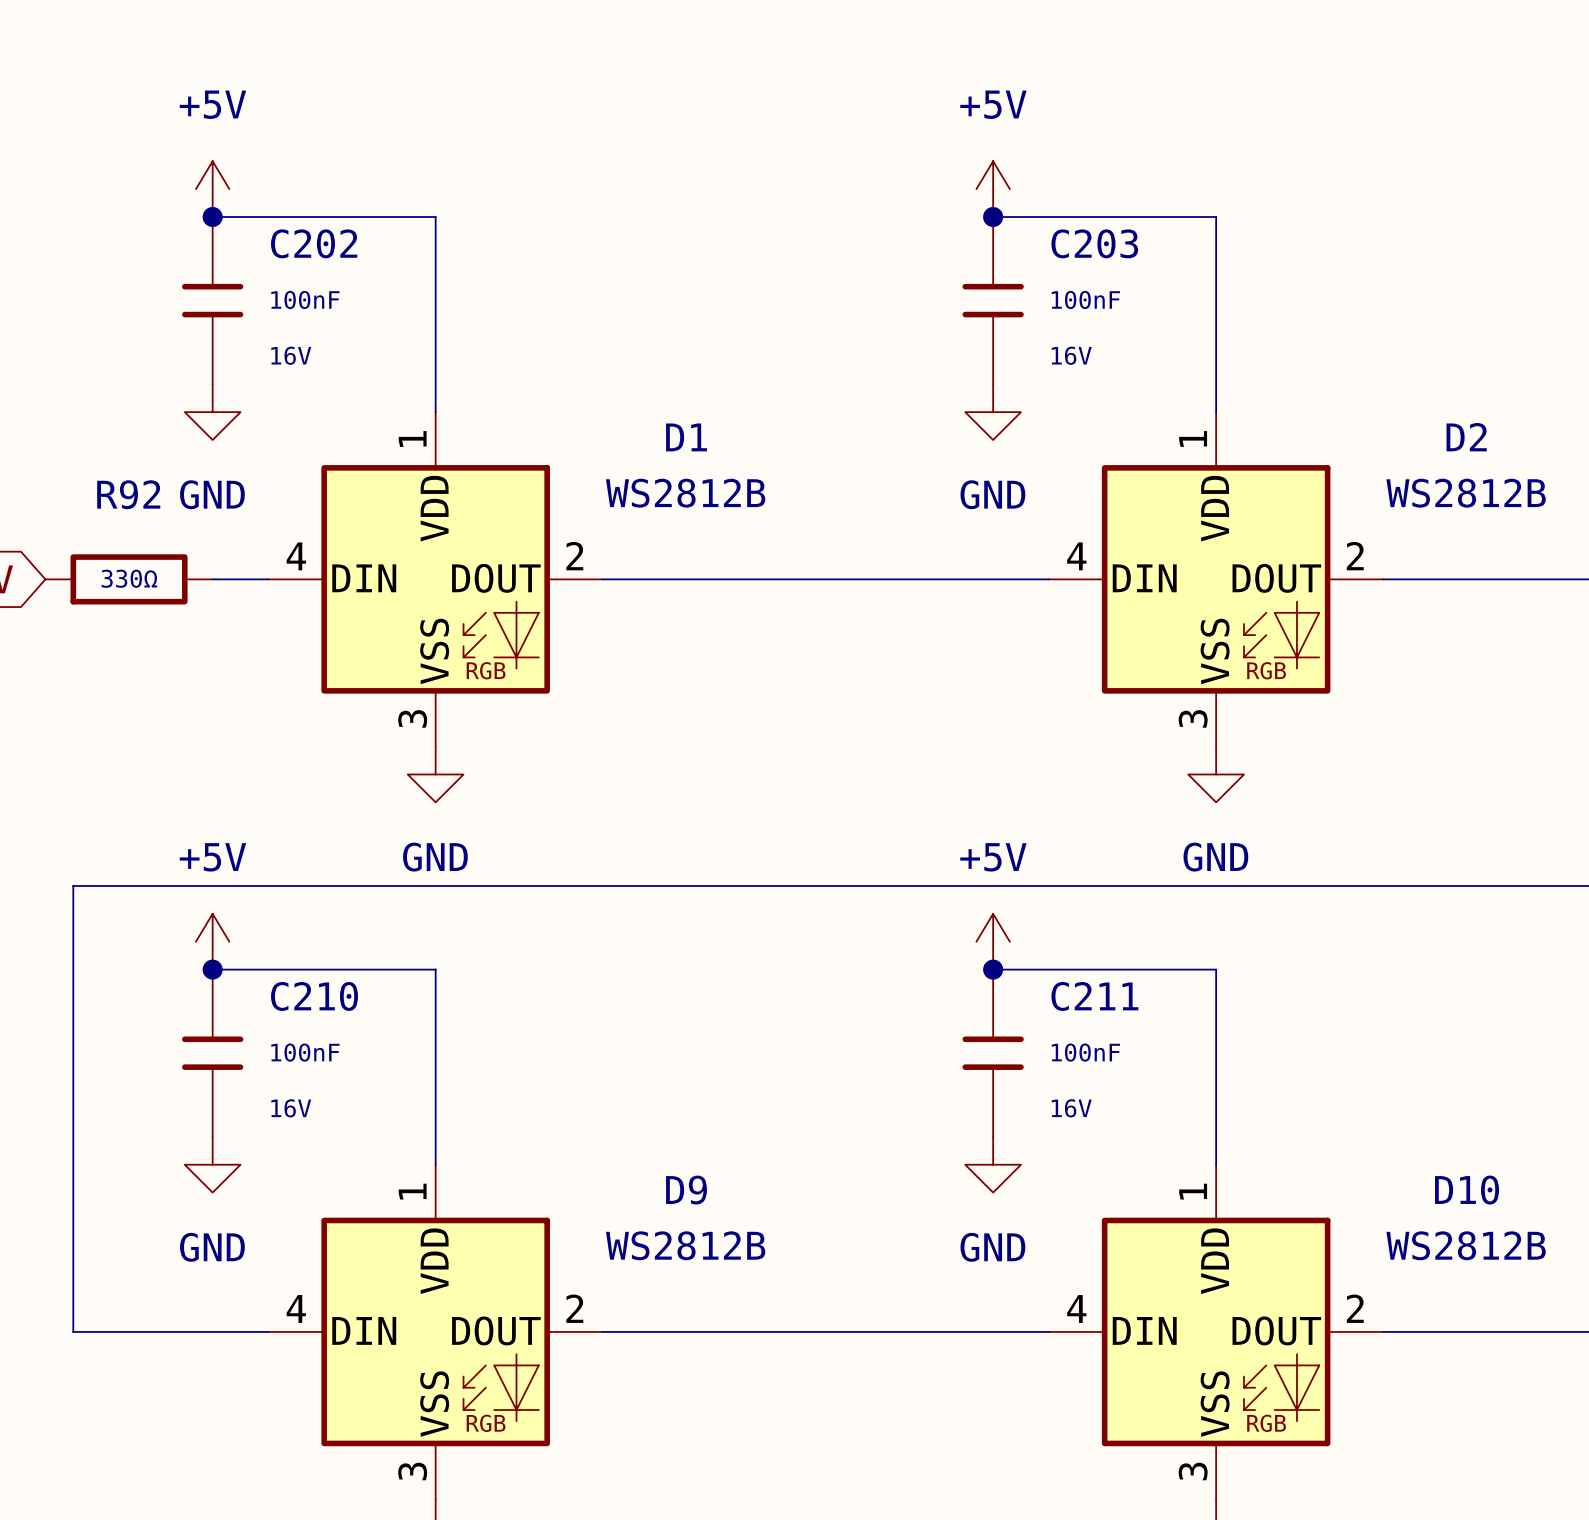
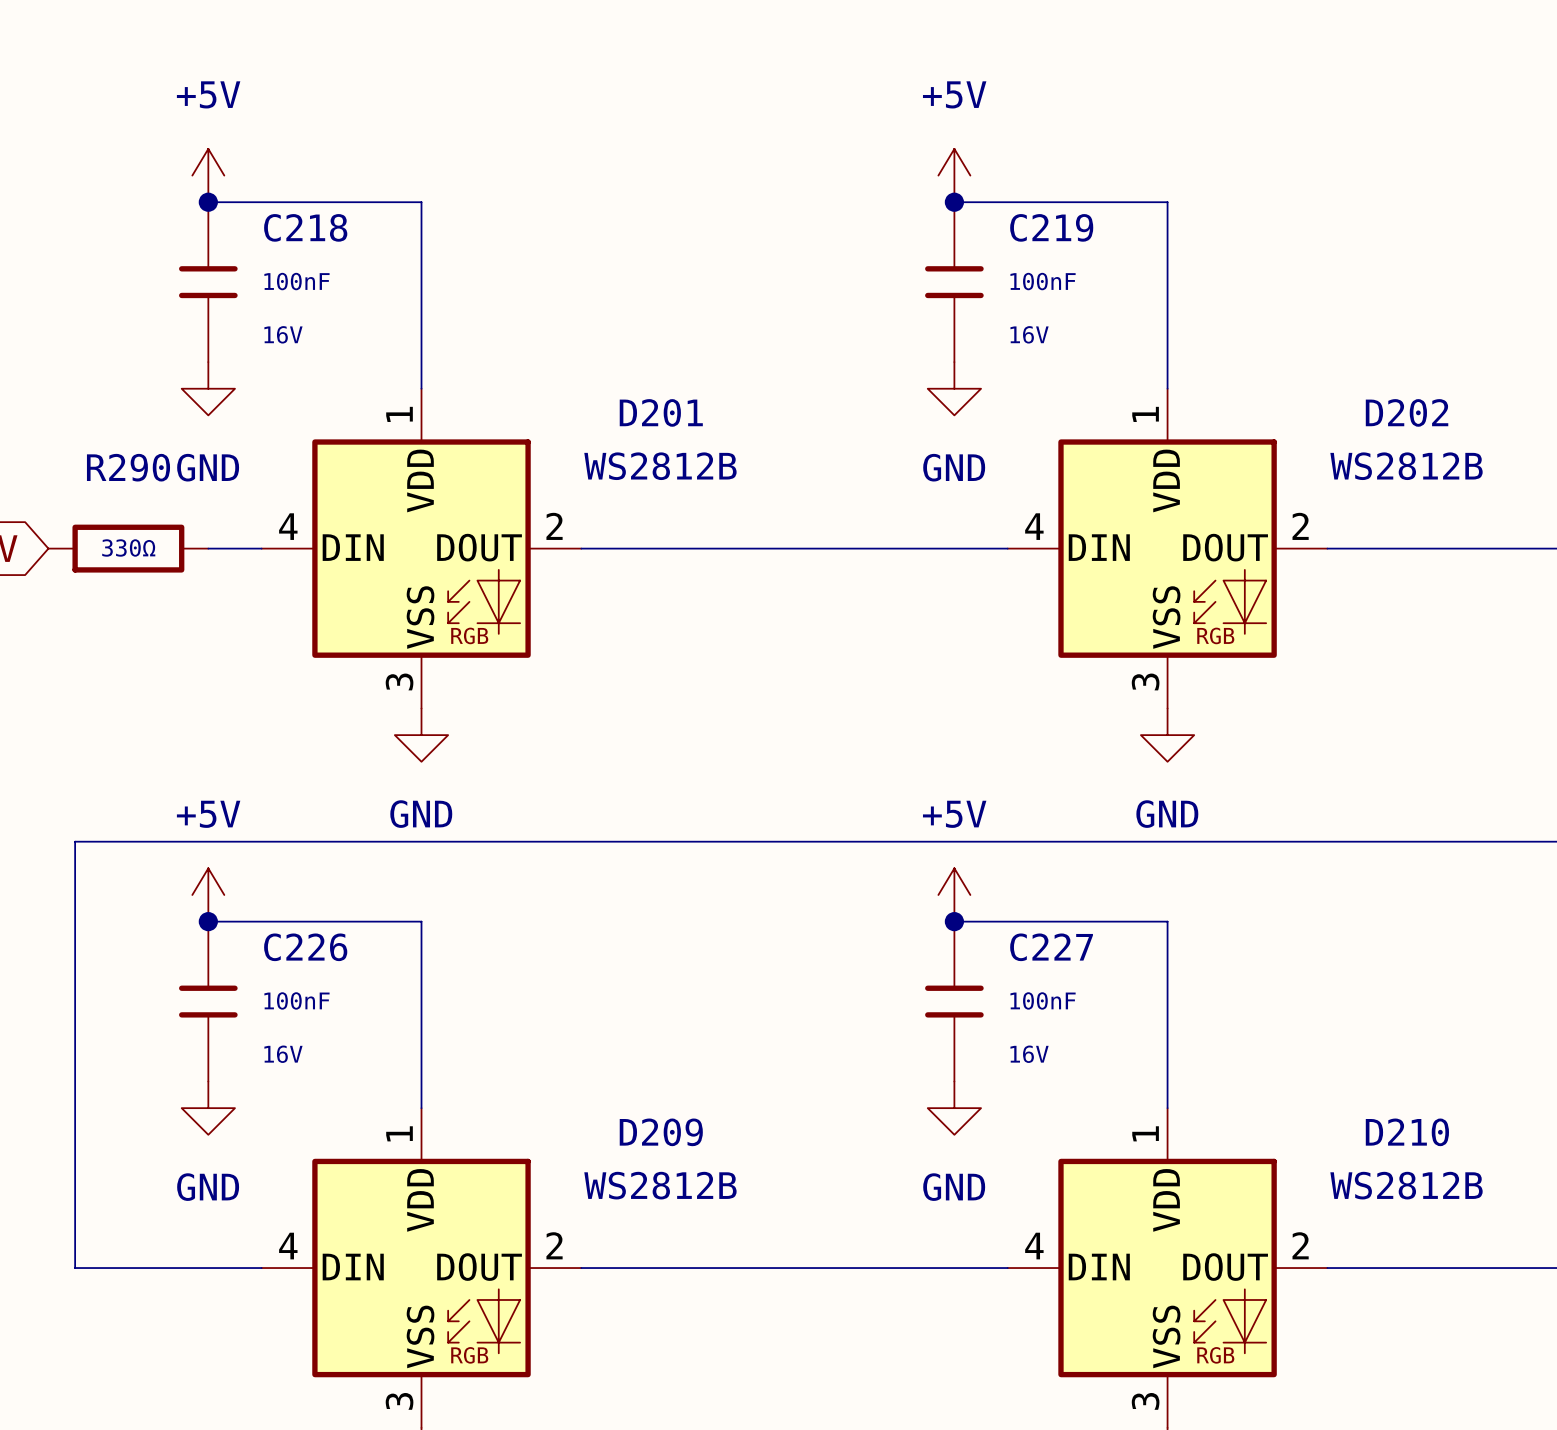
C202 name: C202 (314, 243) -> C218 (305, 227)
C203 name: C203 (1094, 243) -> C219 (1051, 227)
D1 name: D1 (686, 437) -> D201 (661, 412)
D2 name: D2 (1466, 437) -> D202 (1407, 412)
R92 name: R92 (128, 494) -> R290 (128, 467)
C210 name: C210 (314, 996) -> C226 (305, 947)
C211 name: C211 (1094, 996) -> C227 (1051, 947)
D9 name: D9 (686, 1190) -> D209 (661, 1132)
D10 name: D10 (1467, 1190) -> D210 (1407, 1132)

